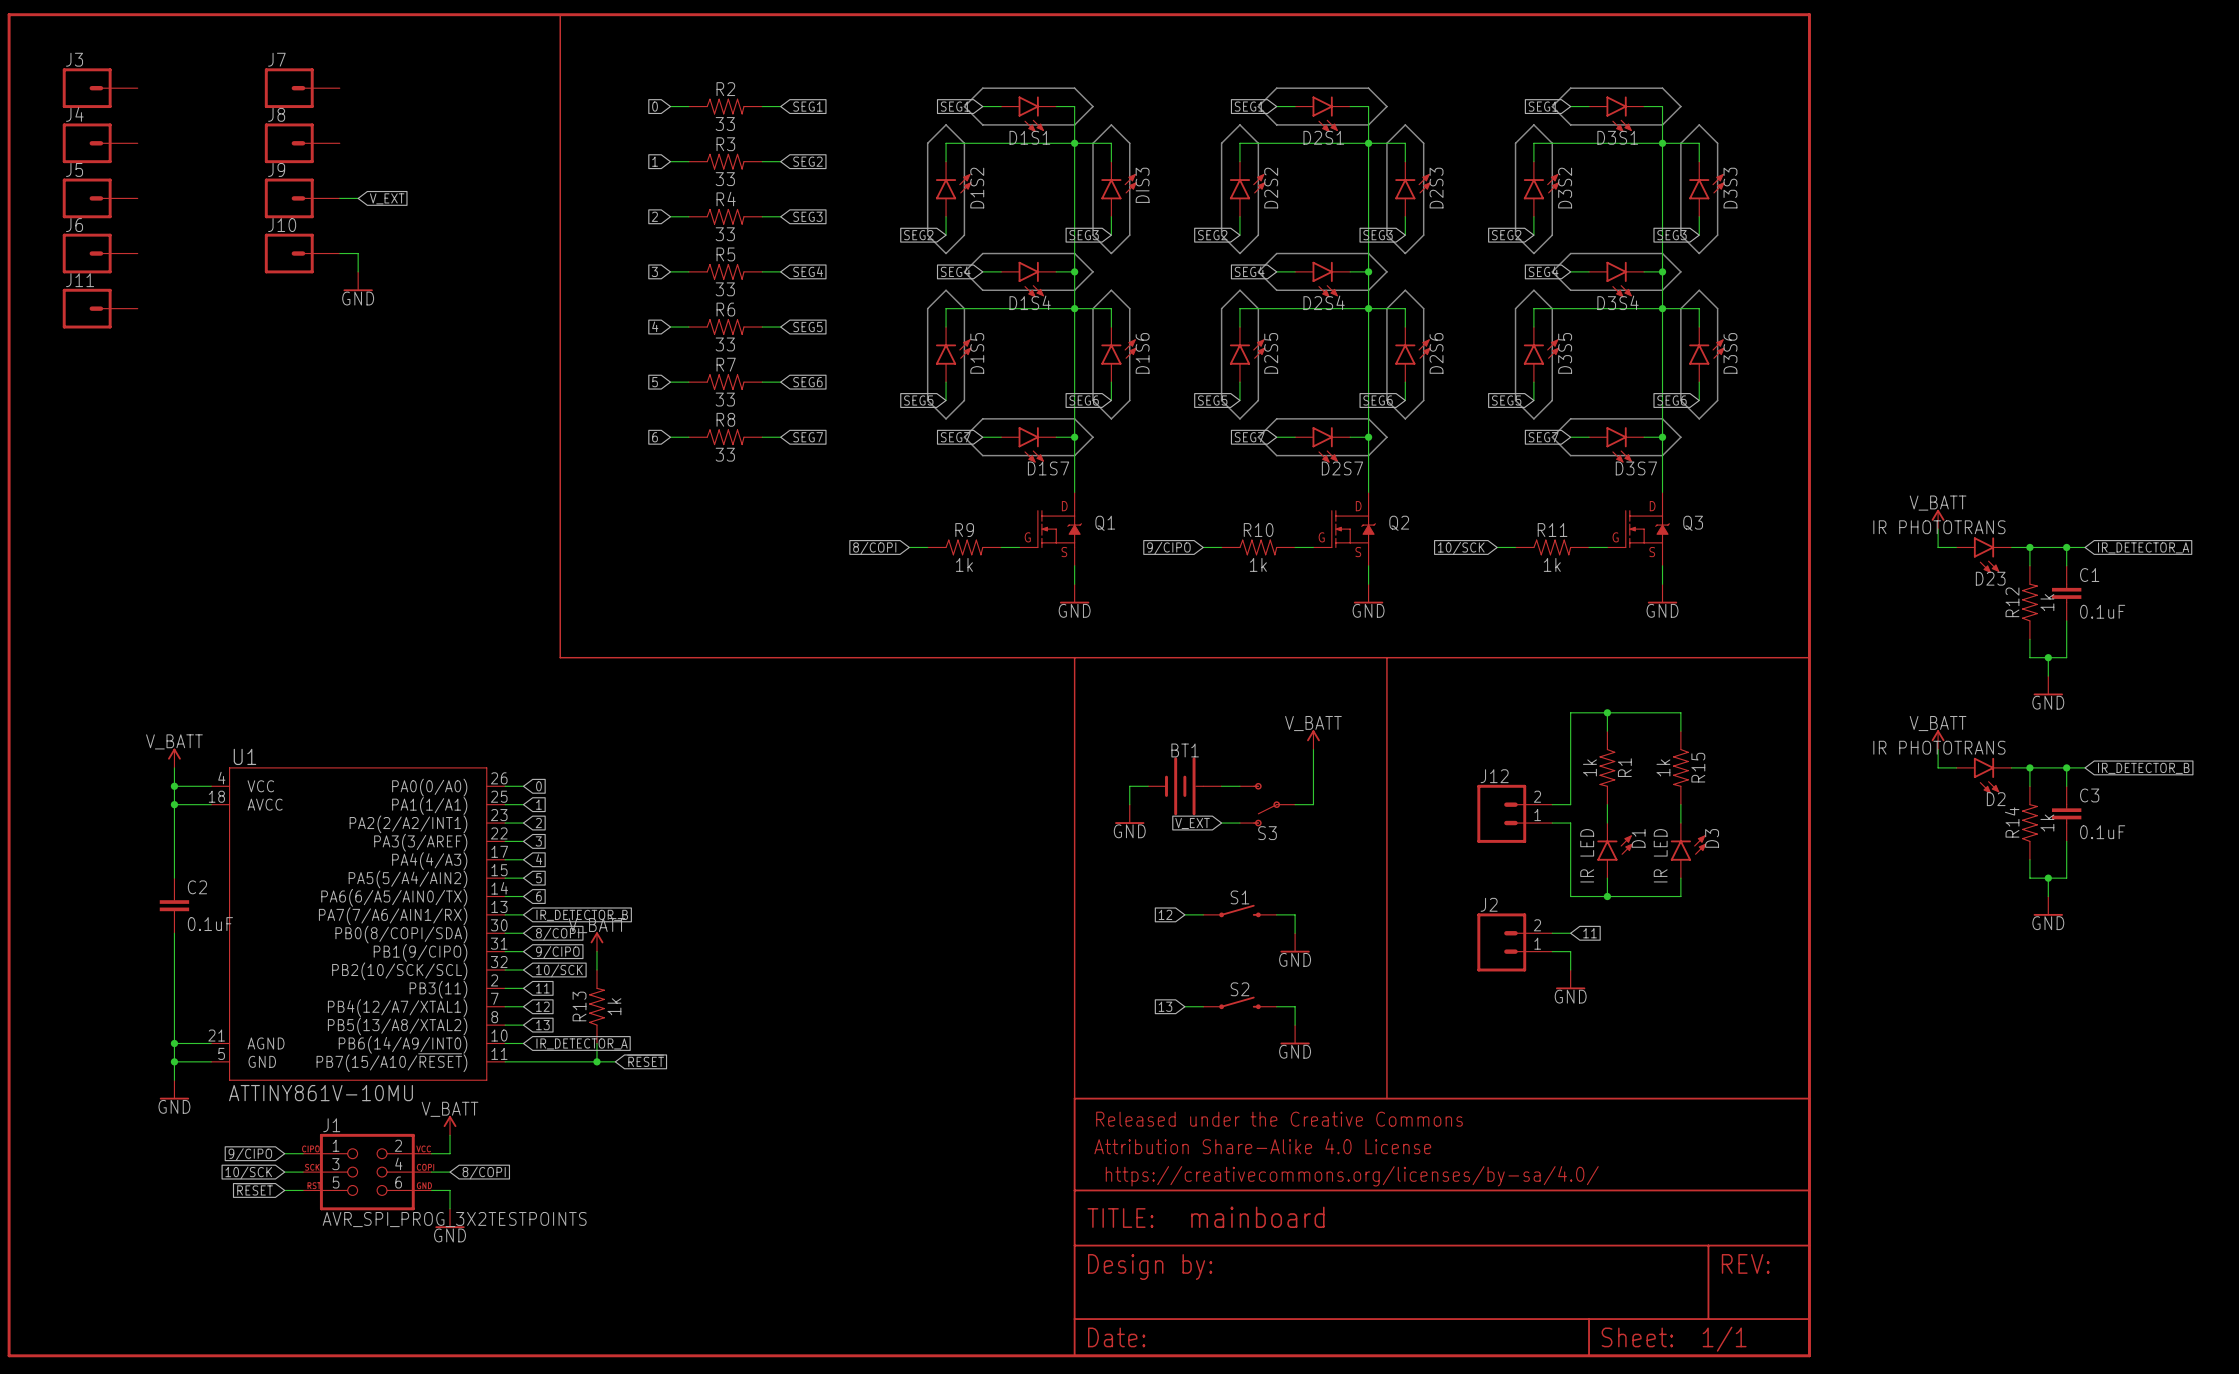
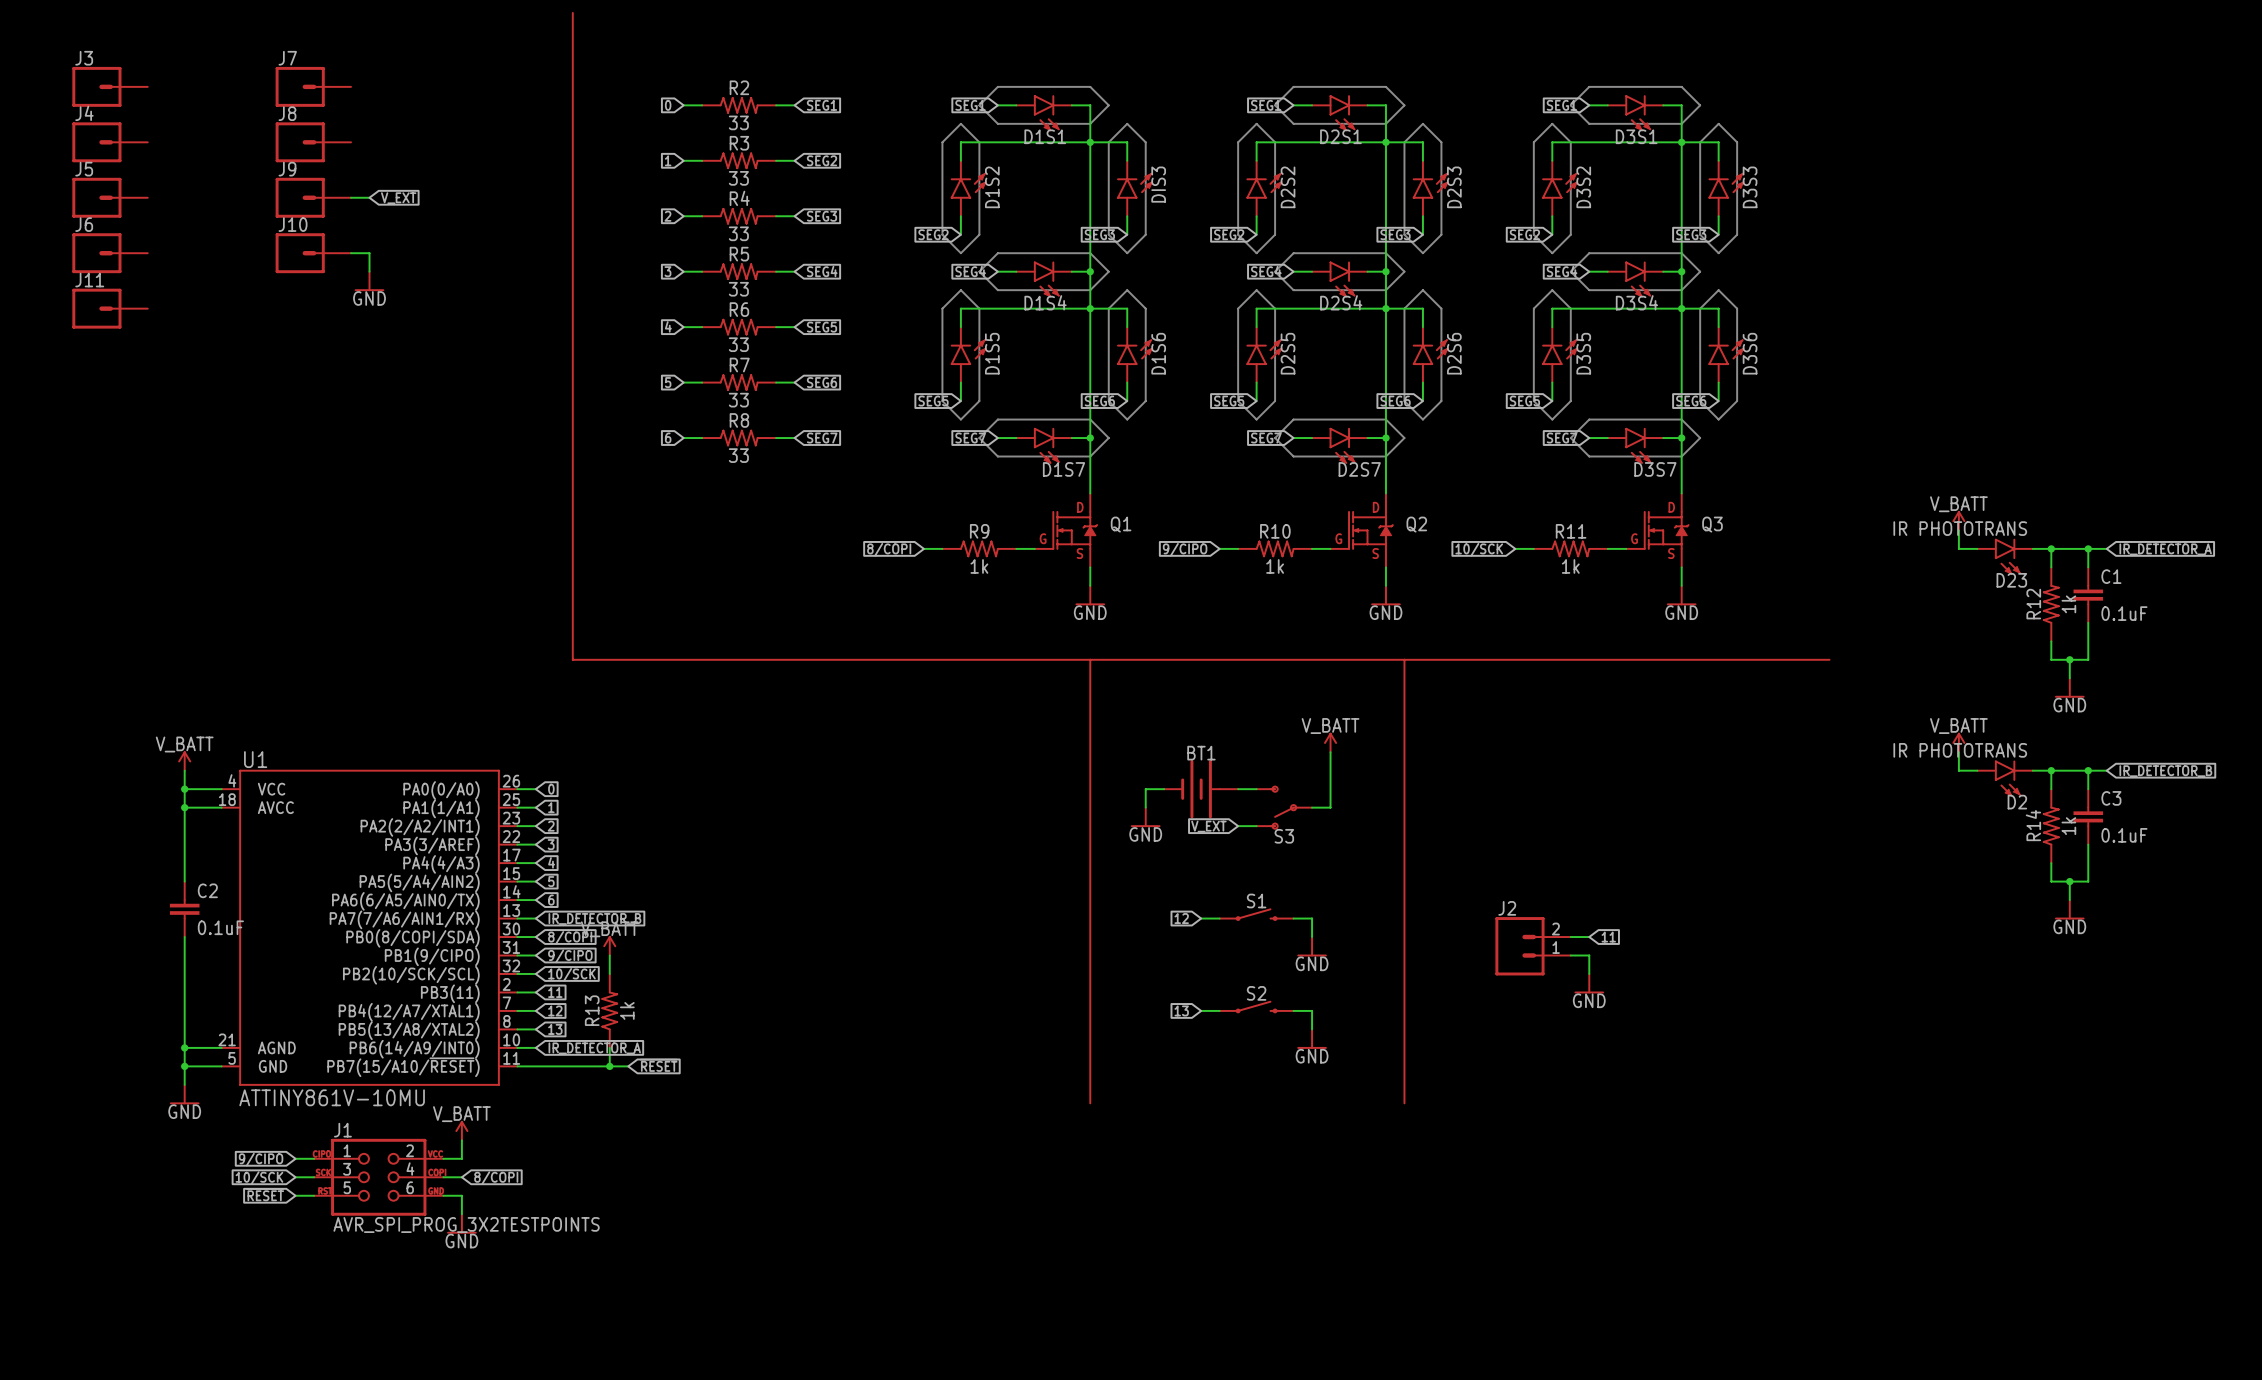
part: (909, 685) -> none
wire: (1607, 712) (1607, 731) -> none
junction: (1607, 712) -> none
wire: (1680, 731) (1680, 712) (1570, 712) (1570, 804) (1552, 804) -> none
R1: 1k (1607, 767) -> none
R15: 1k (1680, 767) -> none
wire: (1607, 804) (1607, 823) -> none
wire: (1680, 804) (1680, 823) -> none
J12: (1514, 813) -> none
wire: (1552, 823) (1570, 823) (1570, 896) (1680, 896) (1680, 878) -> none
D1: IR LED (1615, 850) -> none
D3: IR LED (1688, 850) -> none
wire: (1607, 878) (1607, 896) -> none
junction: (1607, 896) -> none
part: (1442, 1227) -> none

